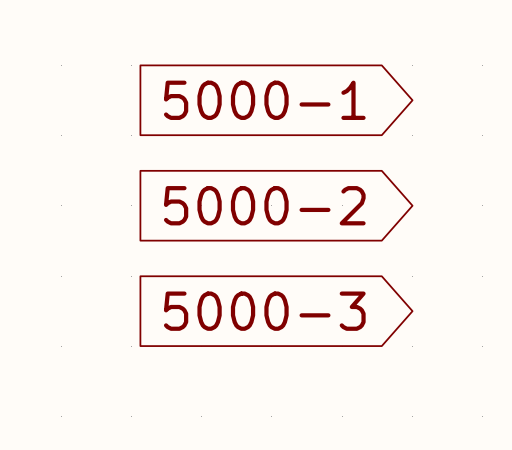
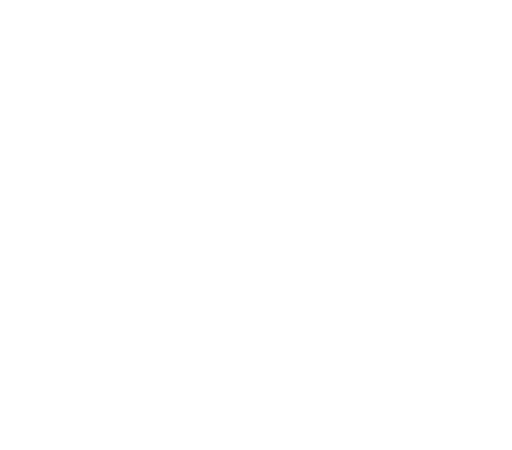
global label: 5000-1 (264, 100) -> none
global label: 5000-2 (264, 205) -> none
global label: 5000-3 (264, 311) -> none

